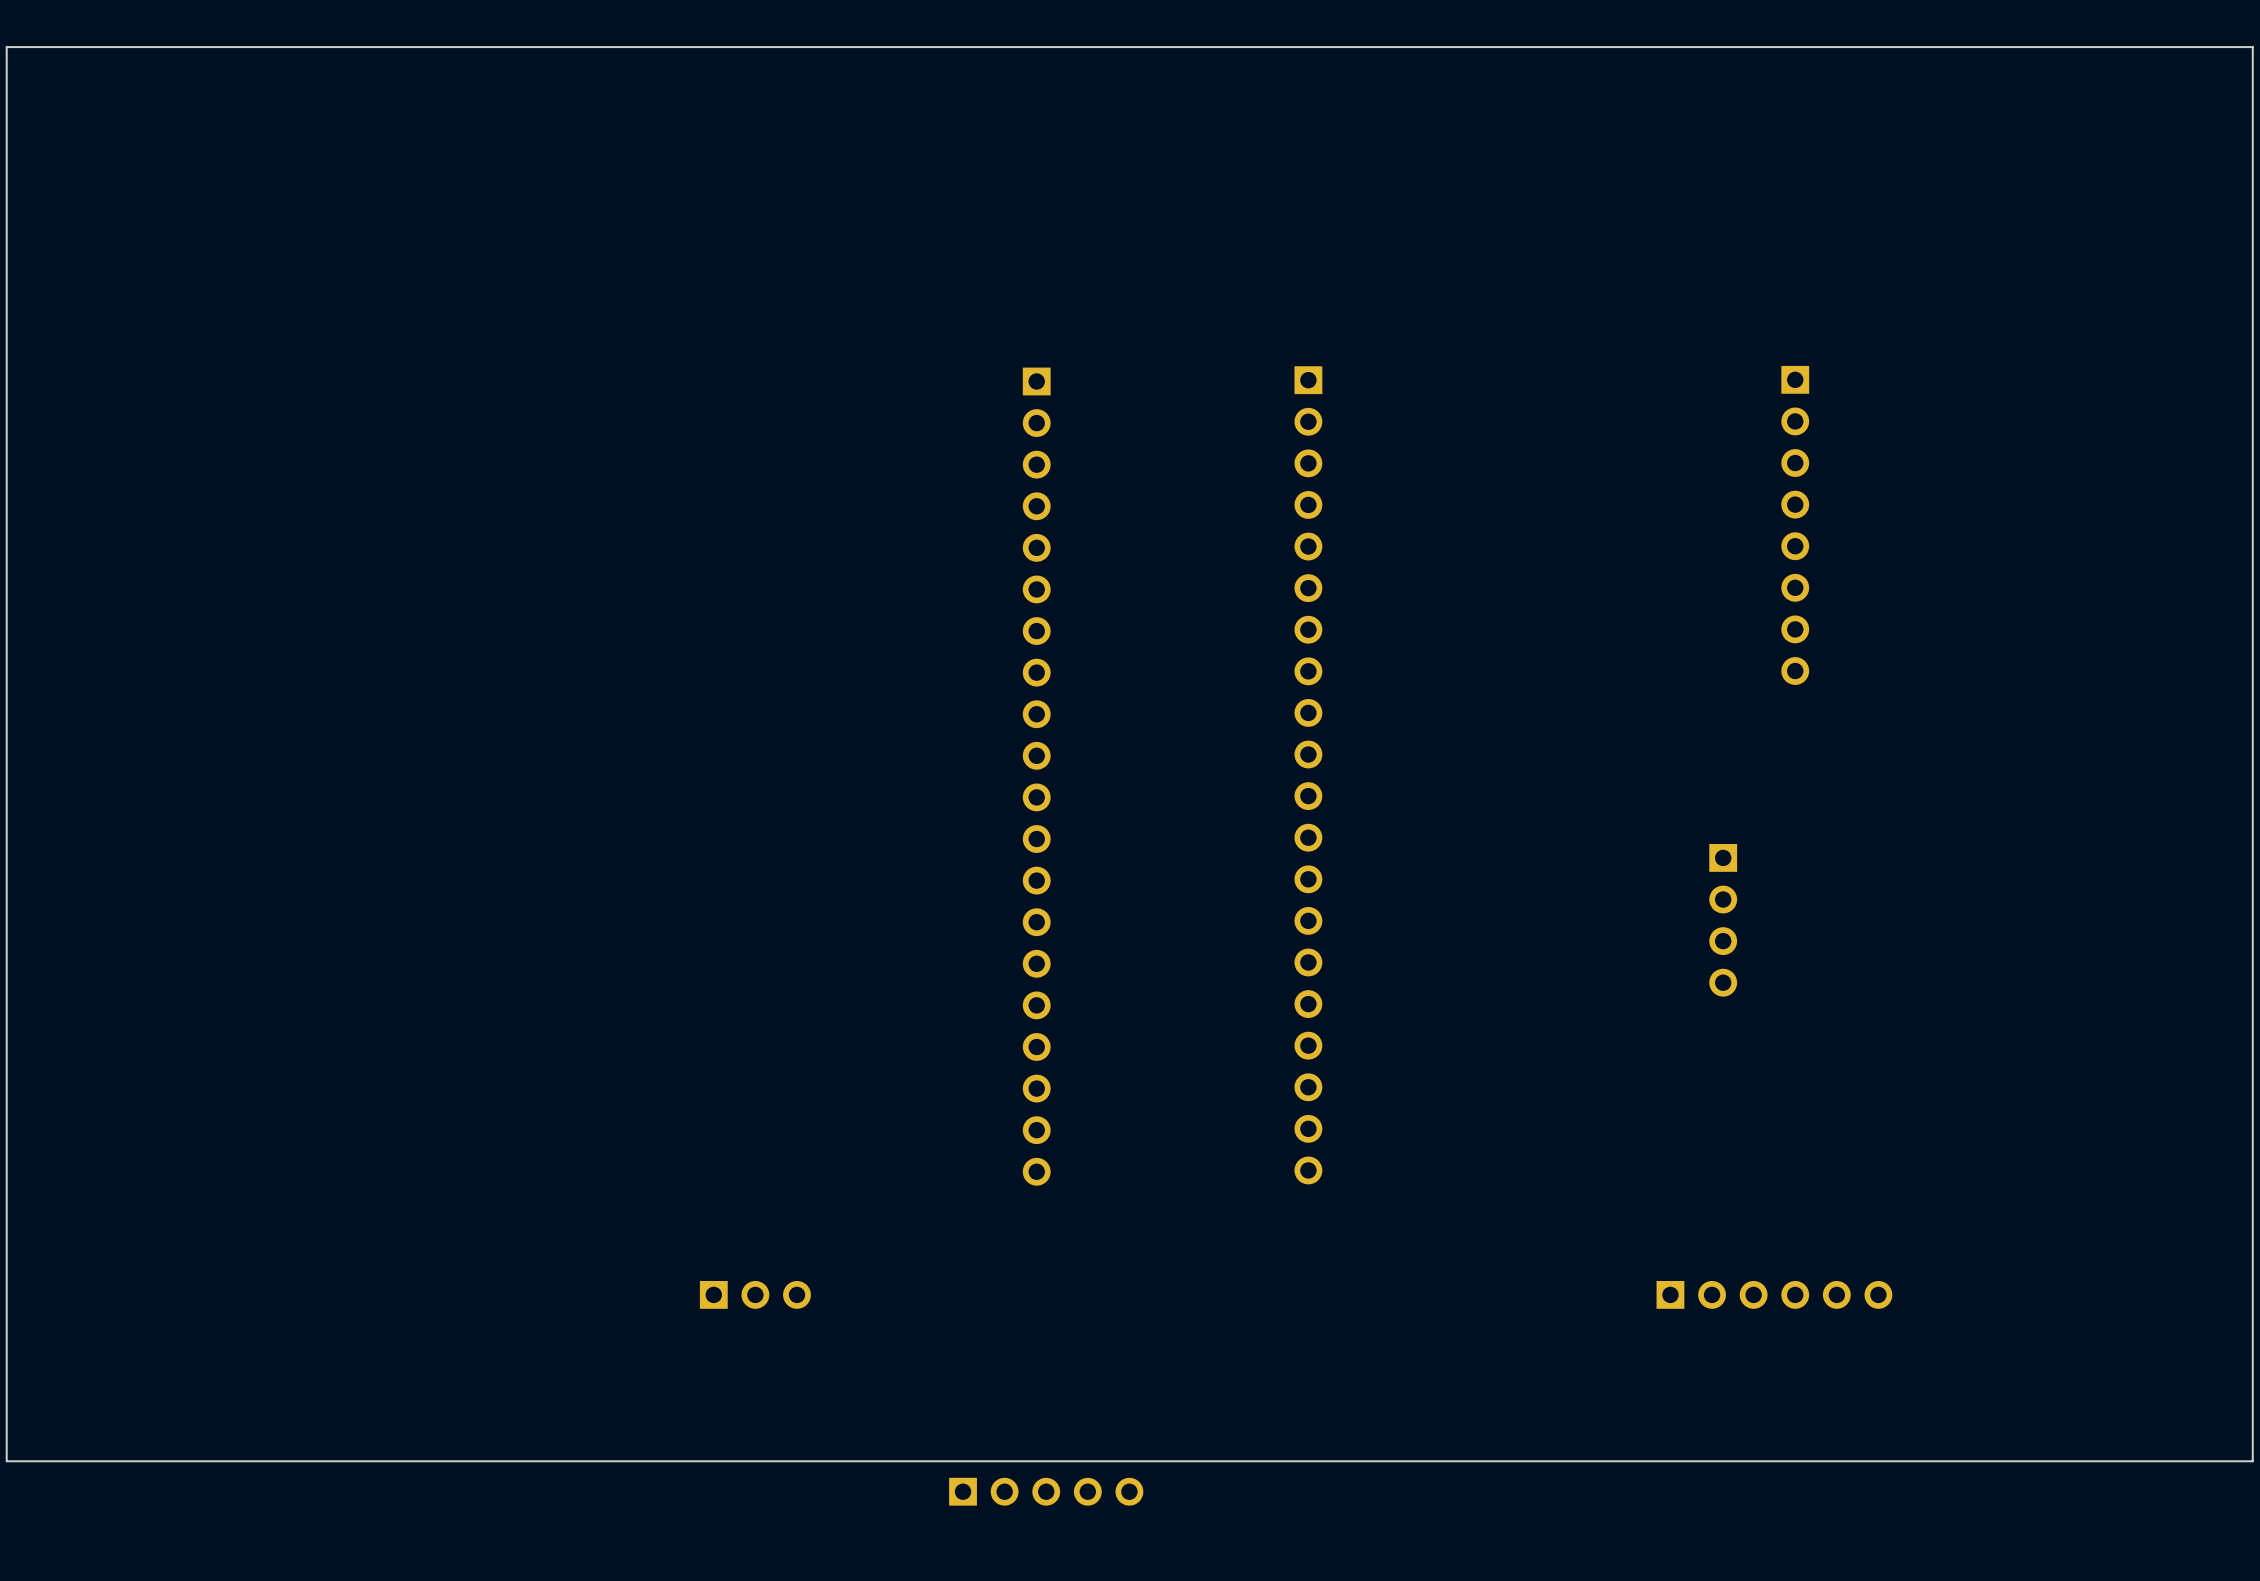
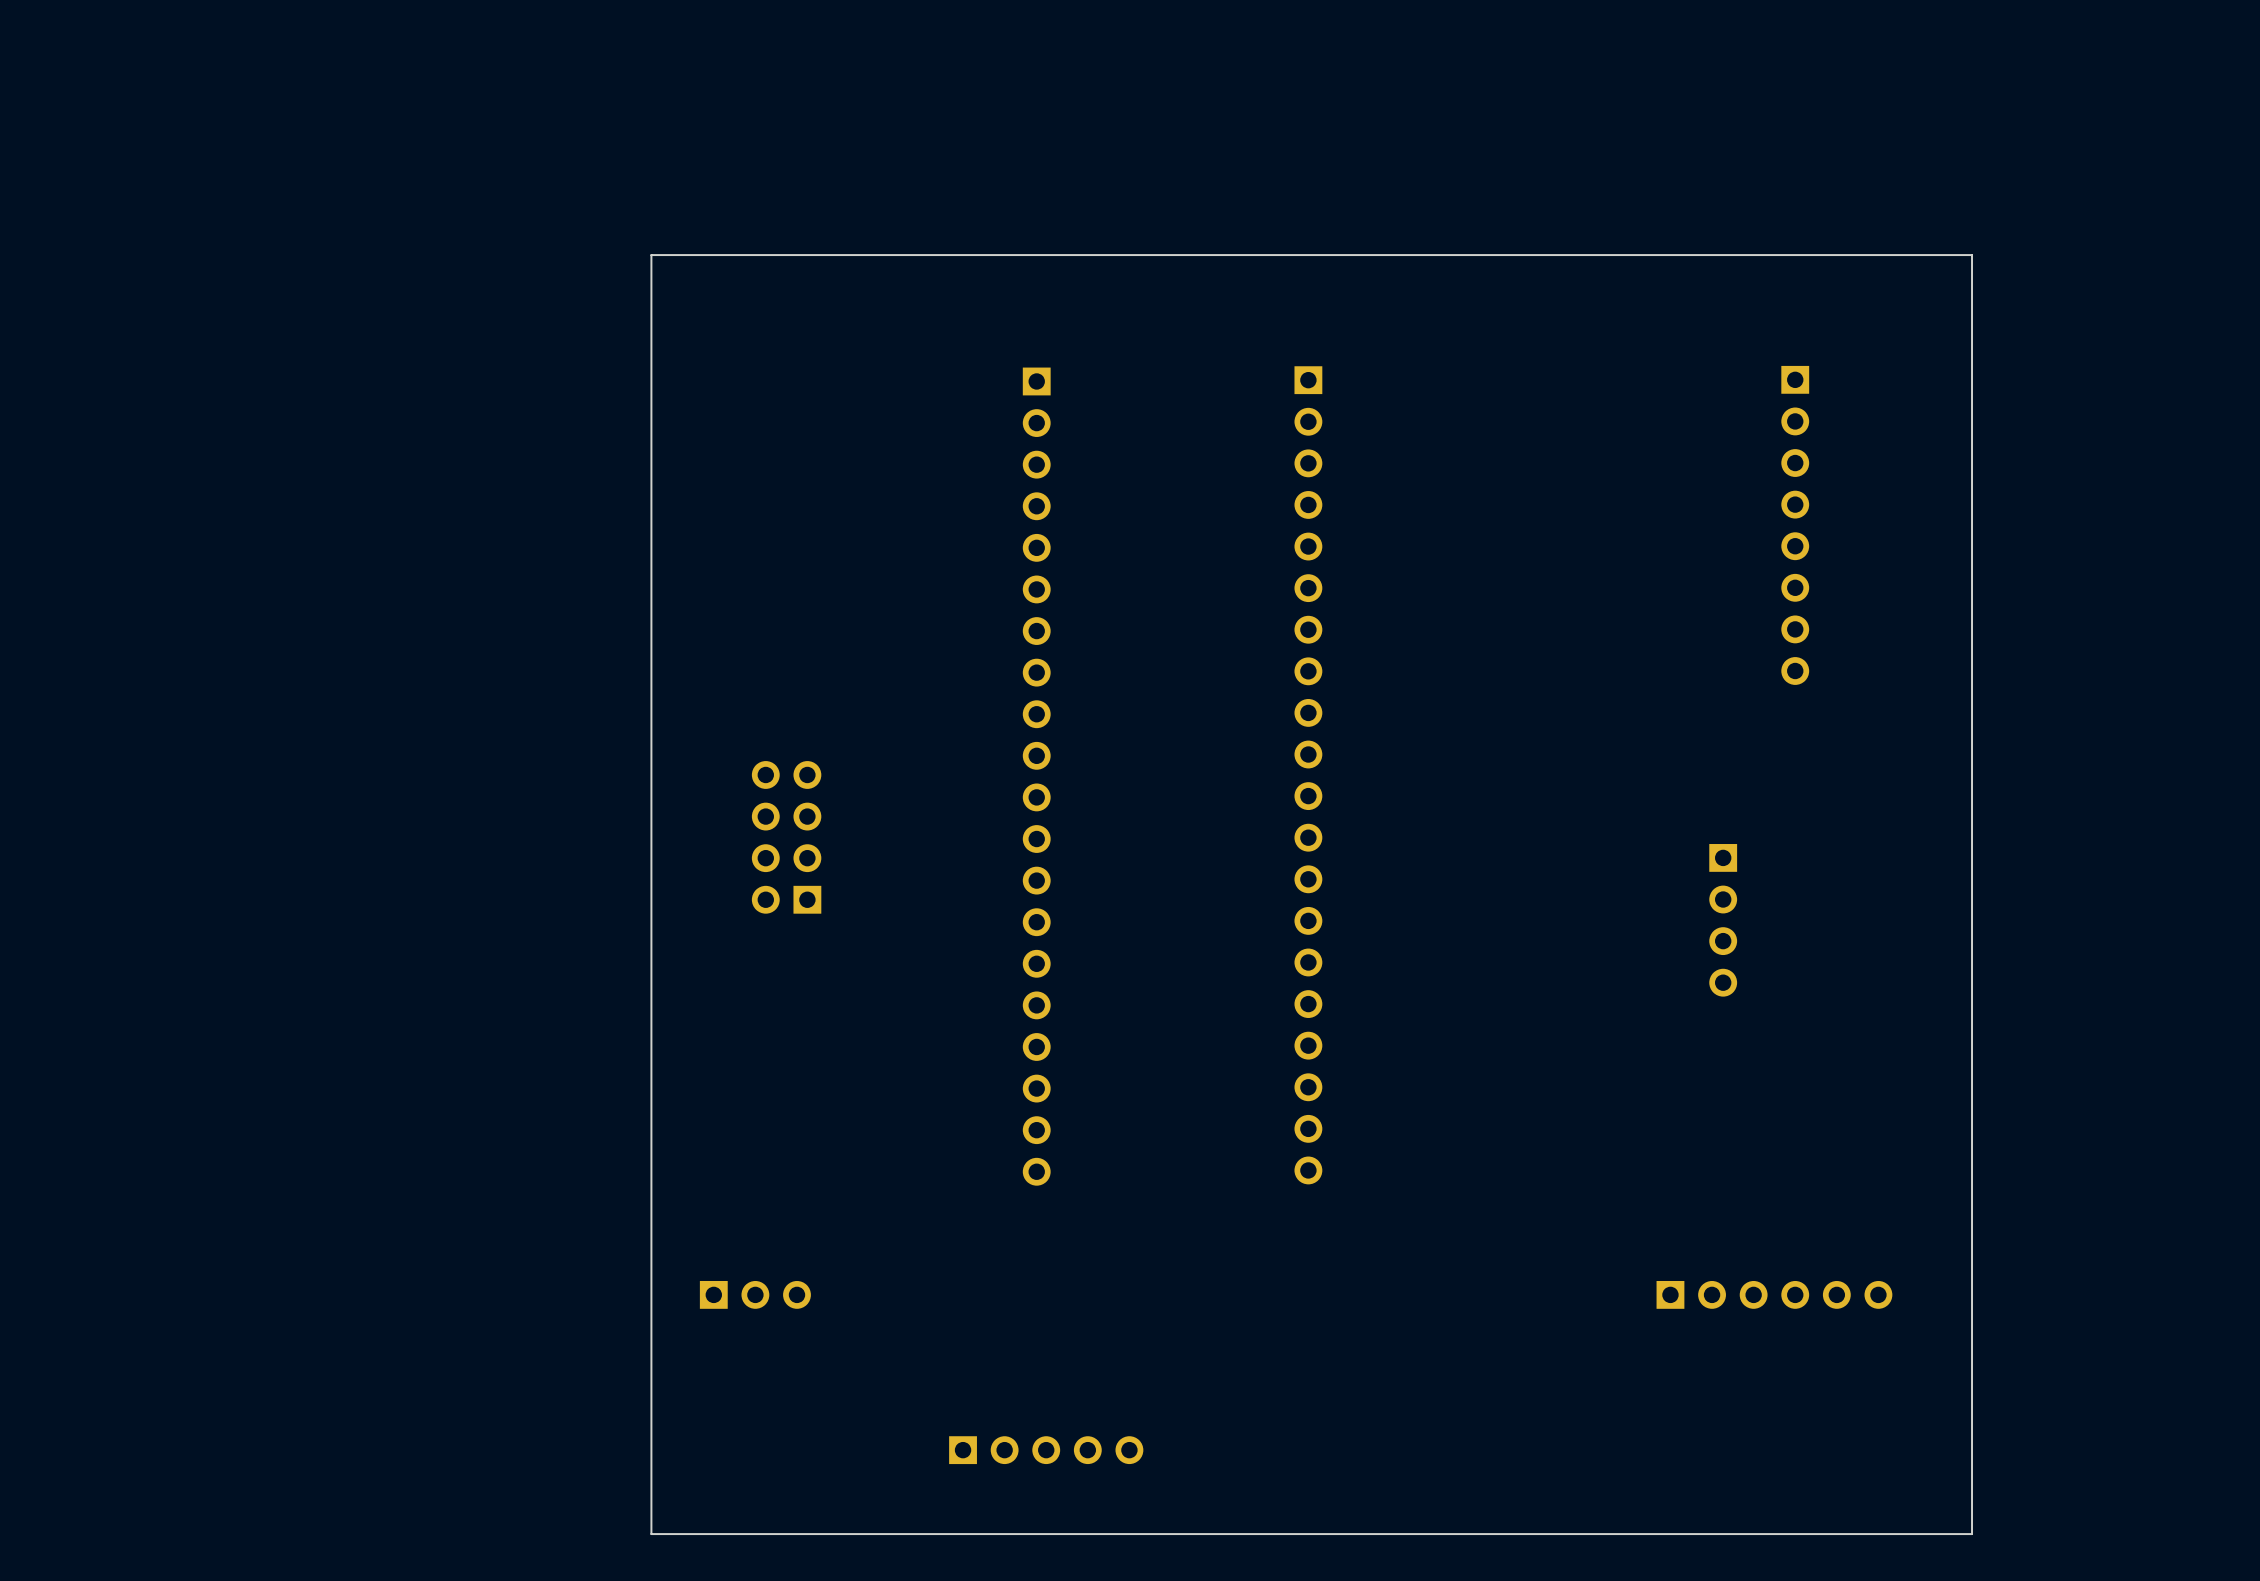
board edge: (2252, 47) (6, 47) (6, 1461) (2252, 1461) (2252, 47) -> none
board edge: none -> (1972, 255) (651, 255) (651, 1534) (1972, 1534) (1972, 255)
part: none -> (786, 837)
part position: (1046, 1491) -> (1046, 1450)

